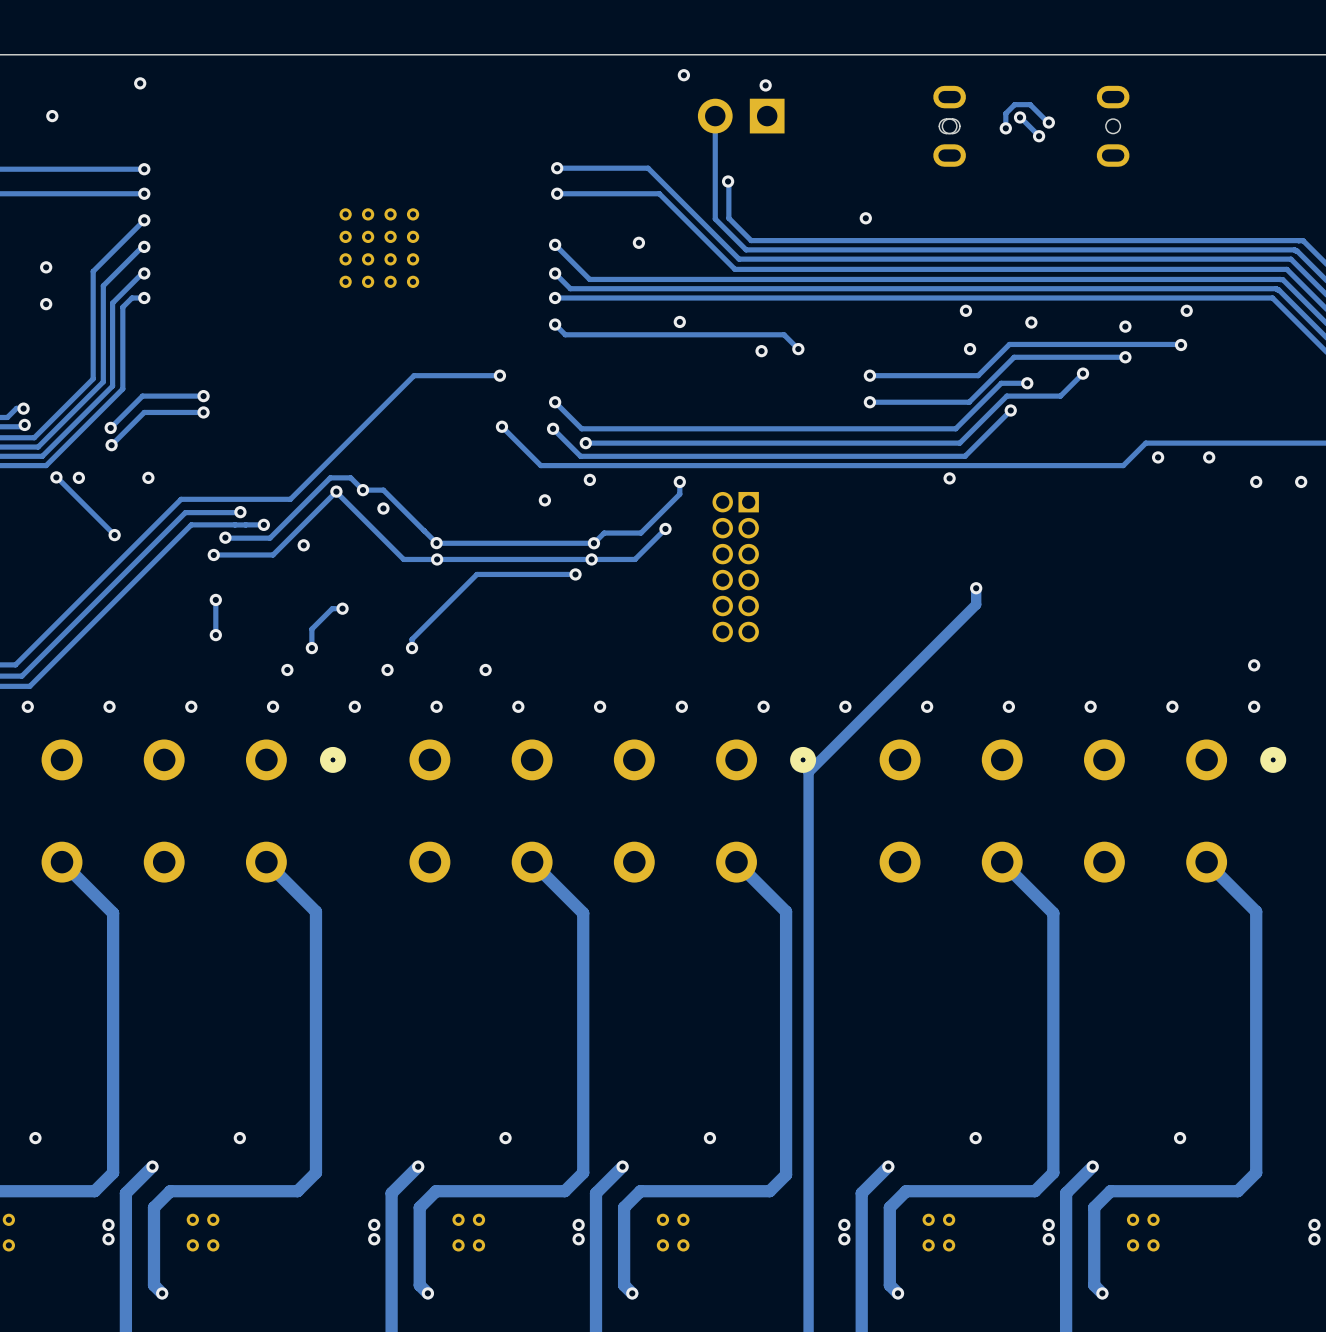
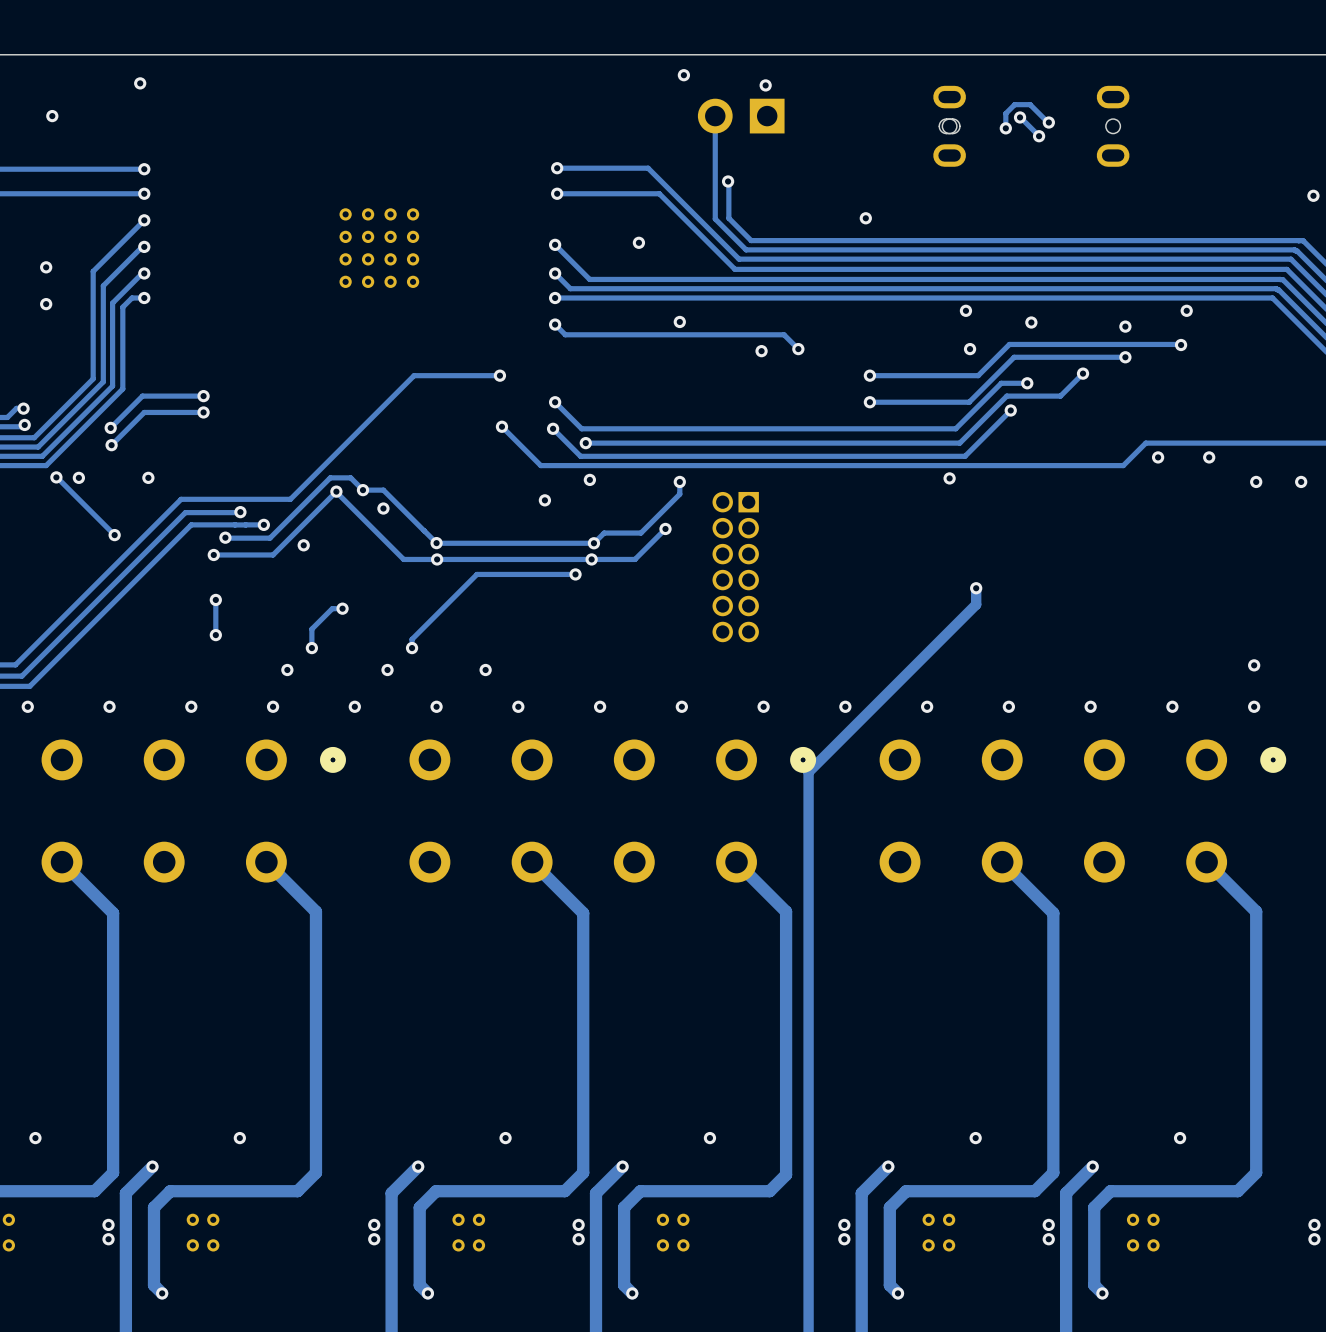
via: none -> (1313, 195)

